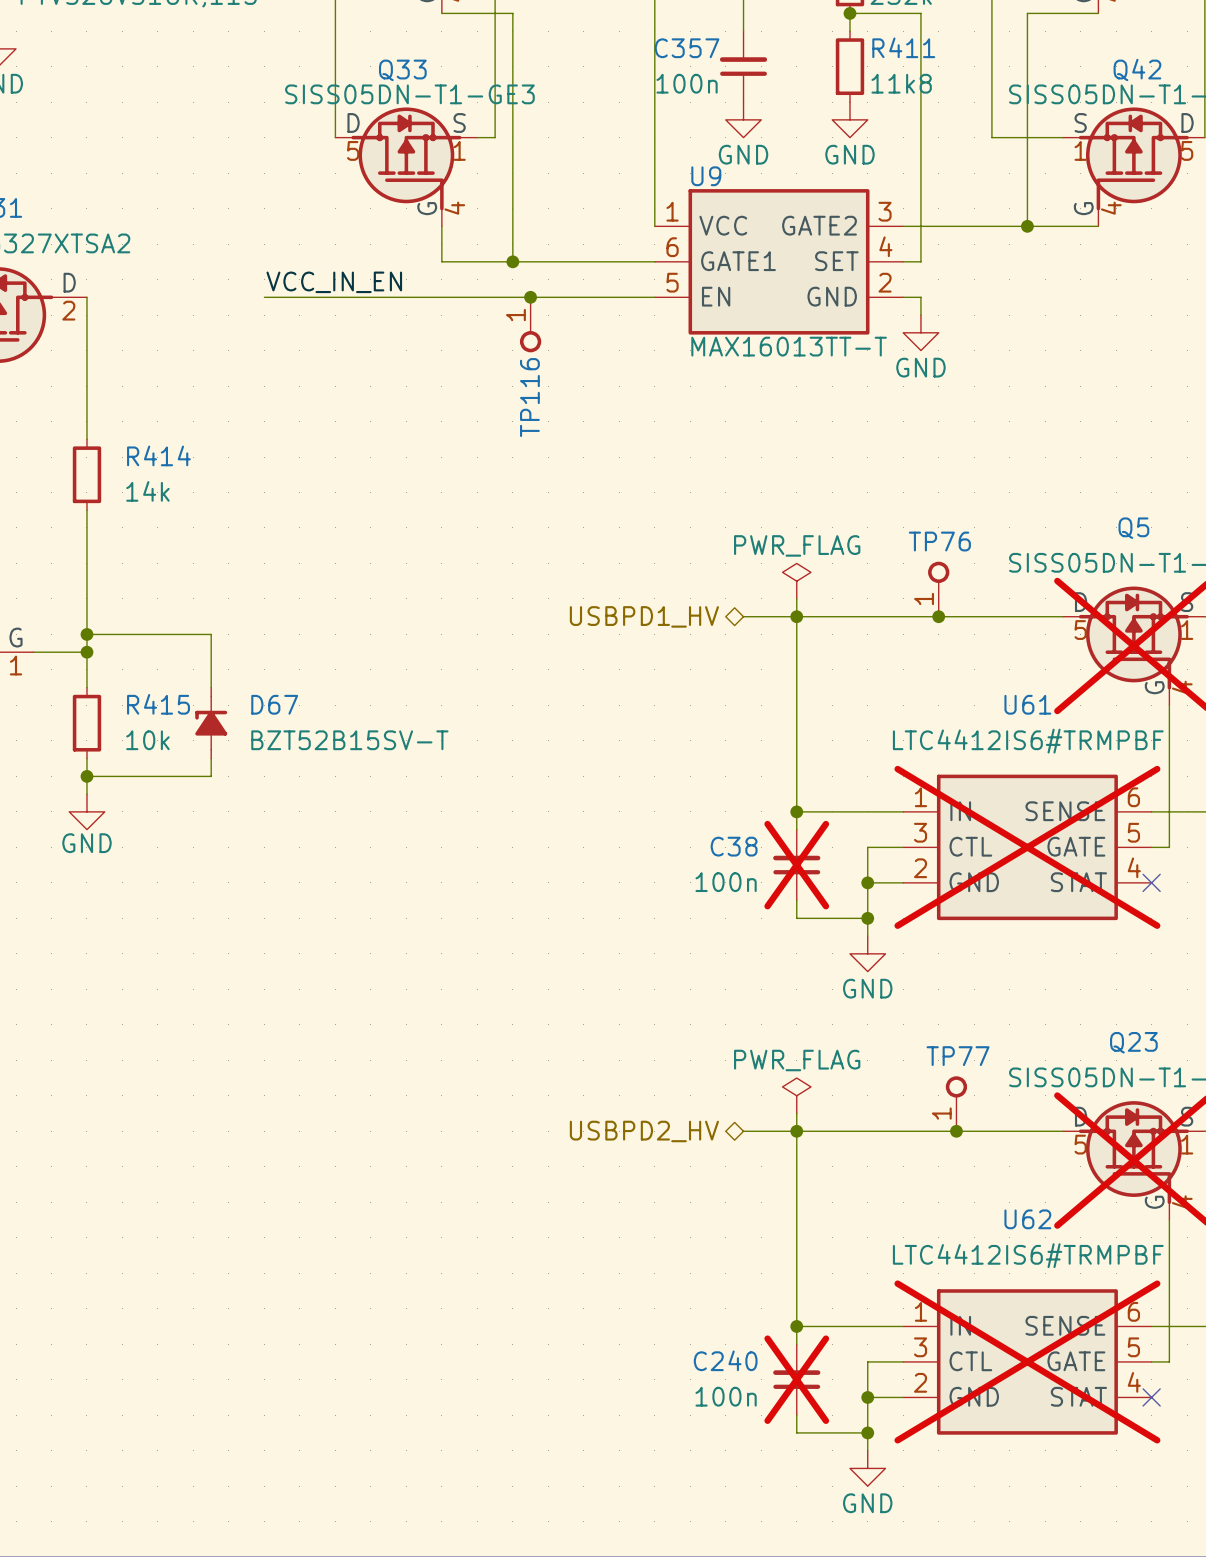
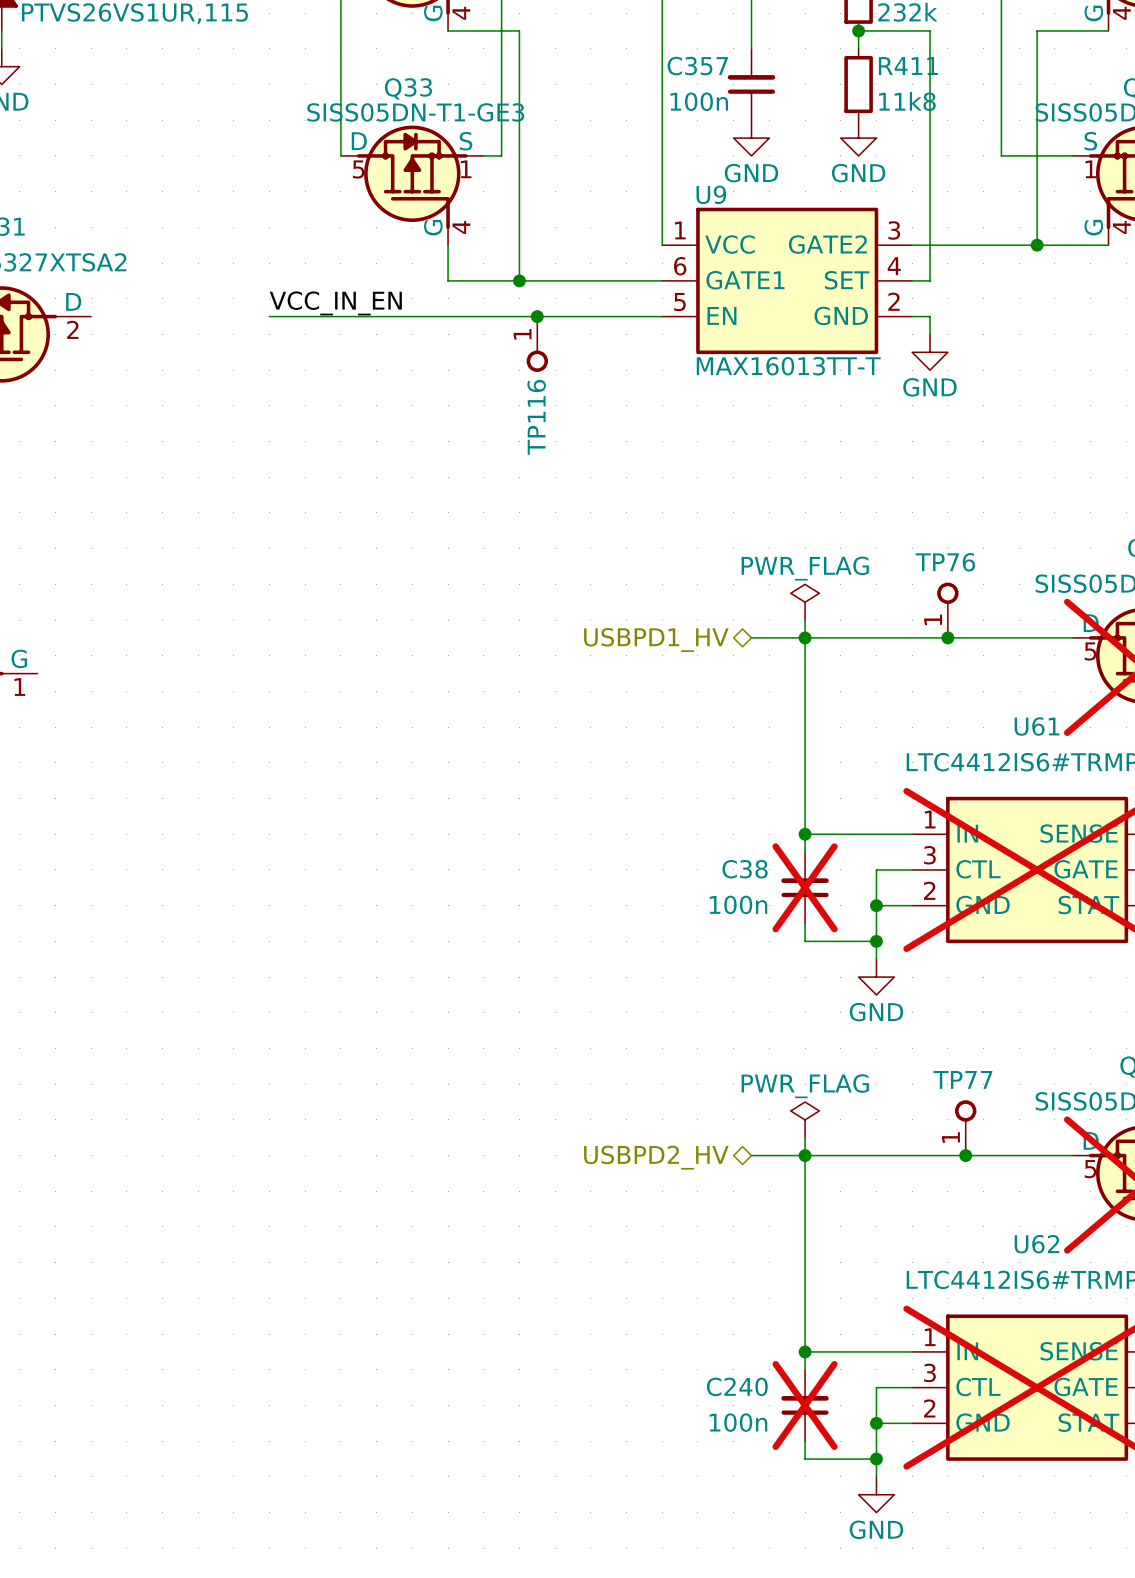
wire: (86, 297) (86, 439) -> none
R414: (86, 474) -> none
wire: (86, 510) (86, 687) -> none
wire: (86, 634) (211, 634) (211, 687) -> none
junction: (86, 634) -> none
wire: (33, 652) (86, 652) -> none
junction: (86, 652) -> none
R415: (86, 723) -> none
D67: (211, 723) -> none
wire: (86, 758) (86, 794) -> none
wire: (211, 758) (211, 776) (86, 776) -> none
junction: (86, 776) -> none
power symbol: GND (86, 811) -> none

